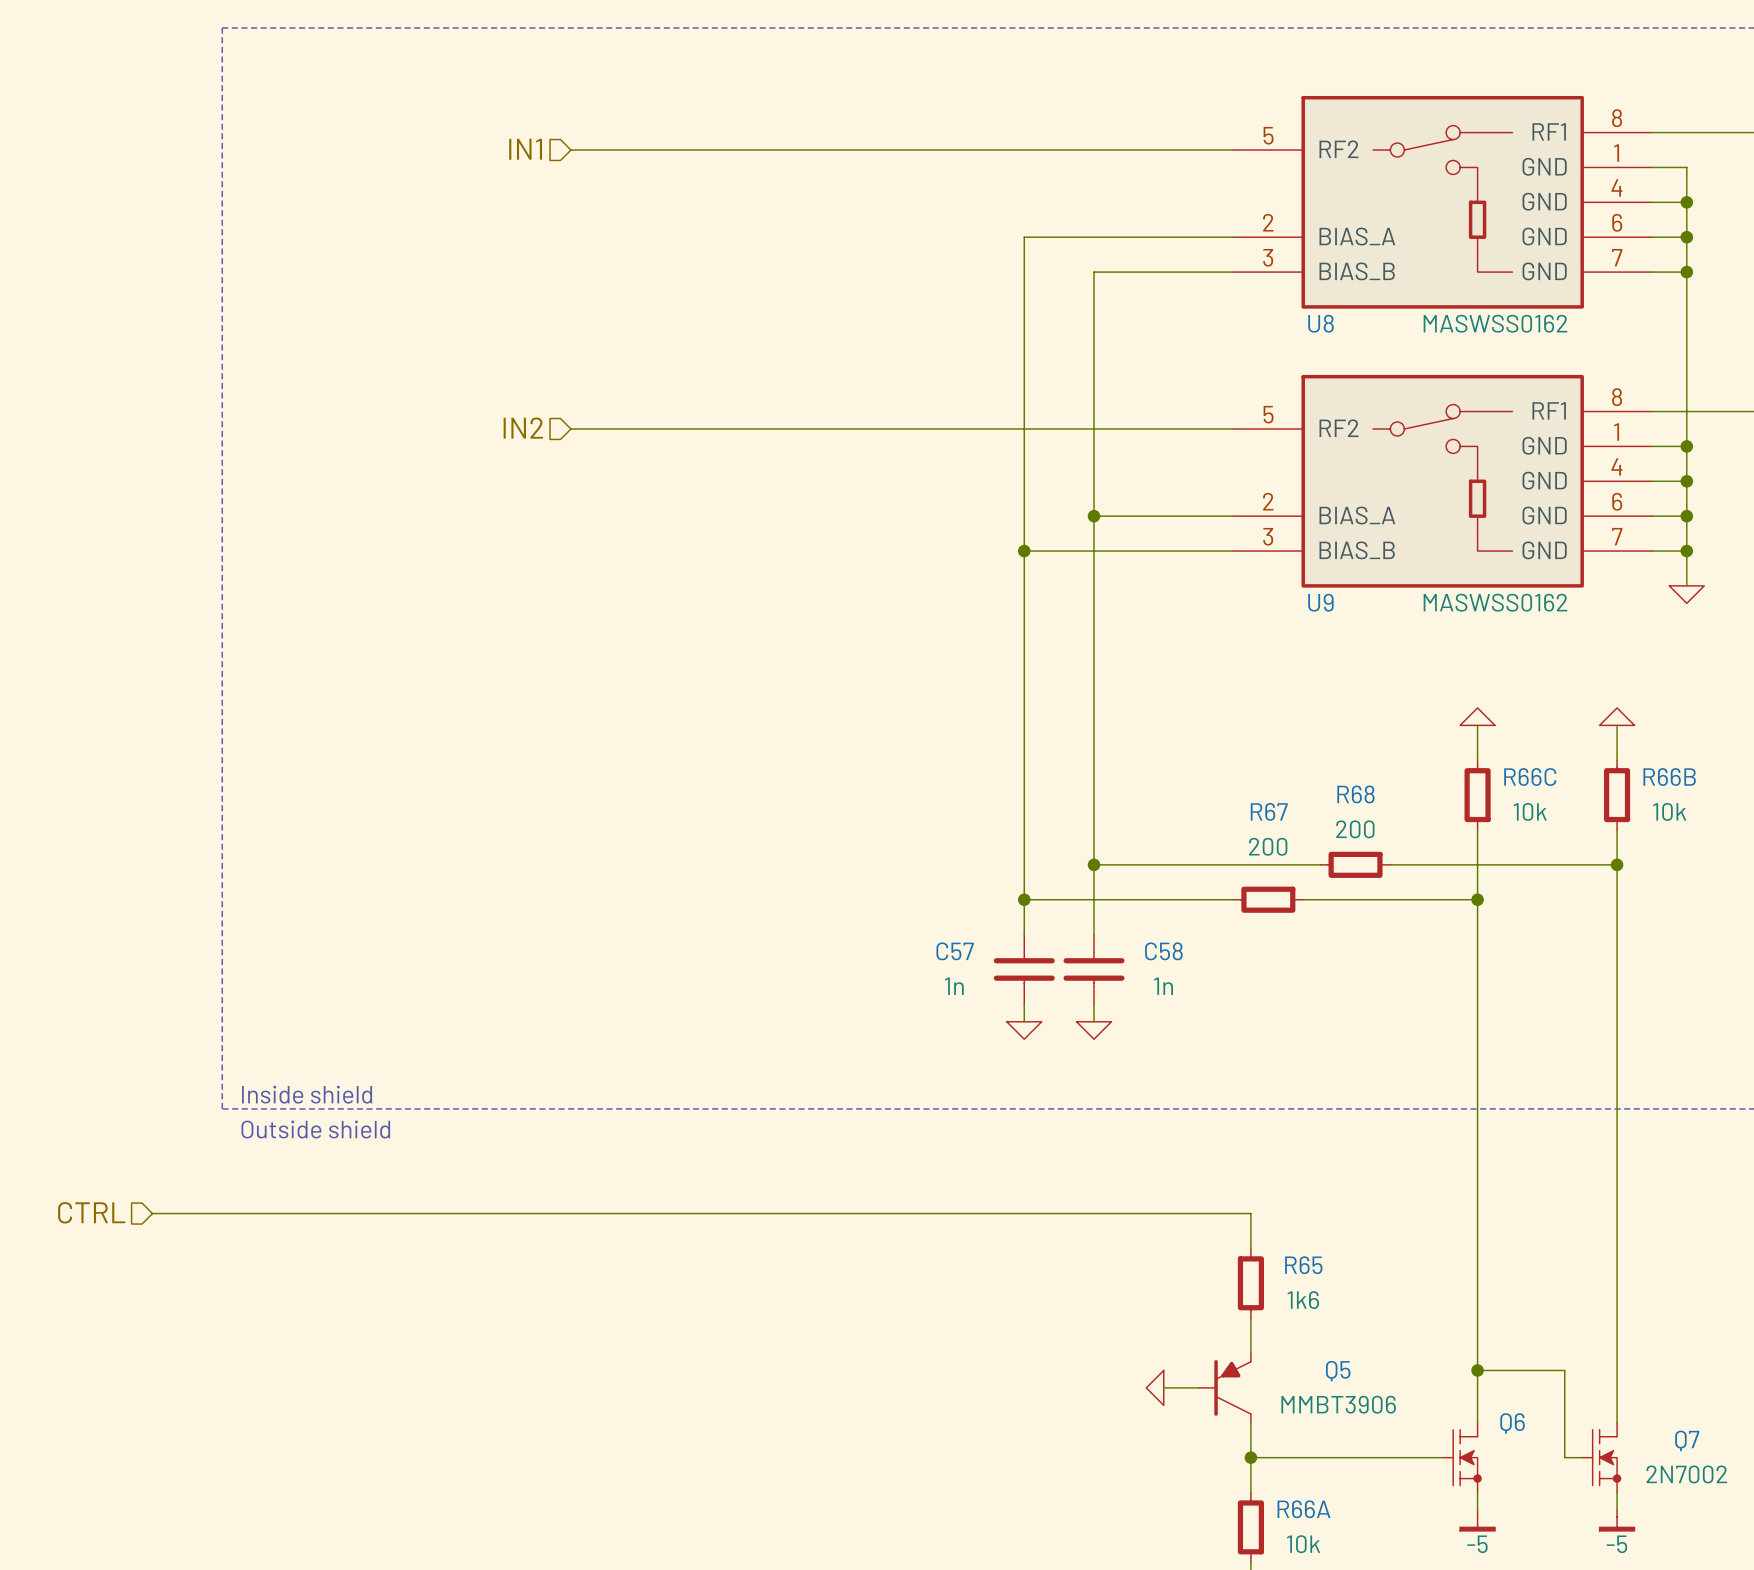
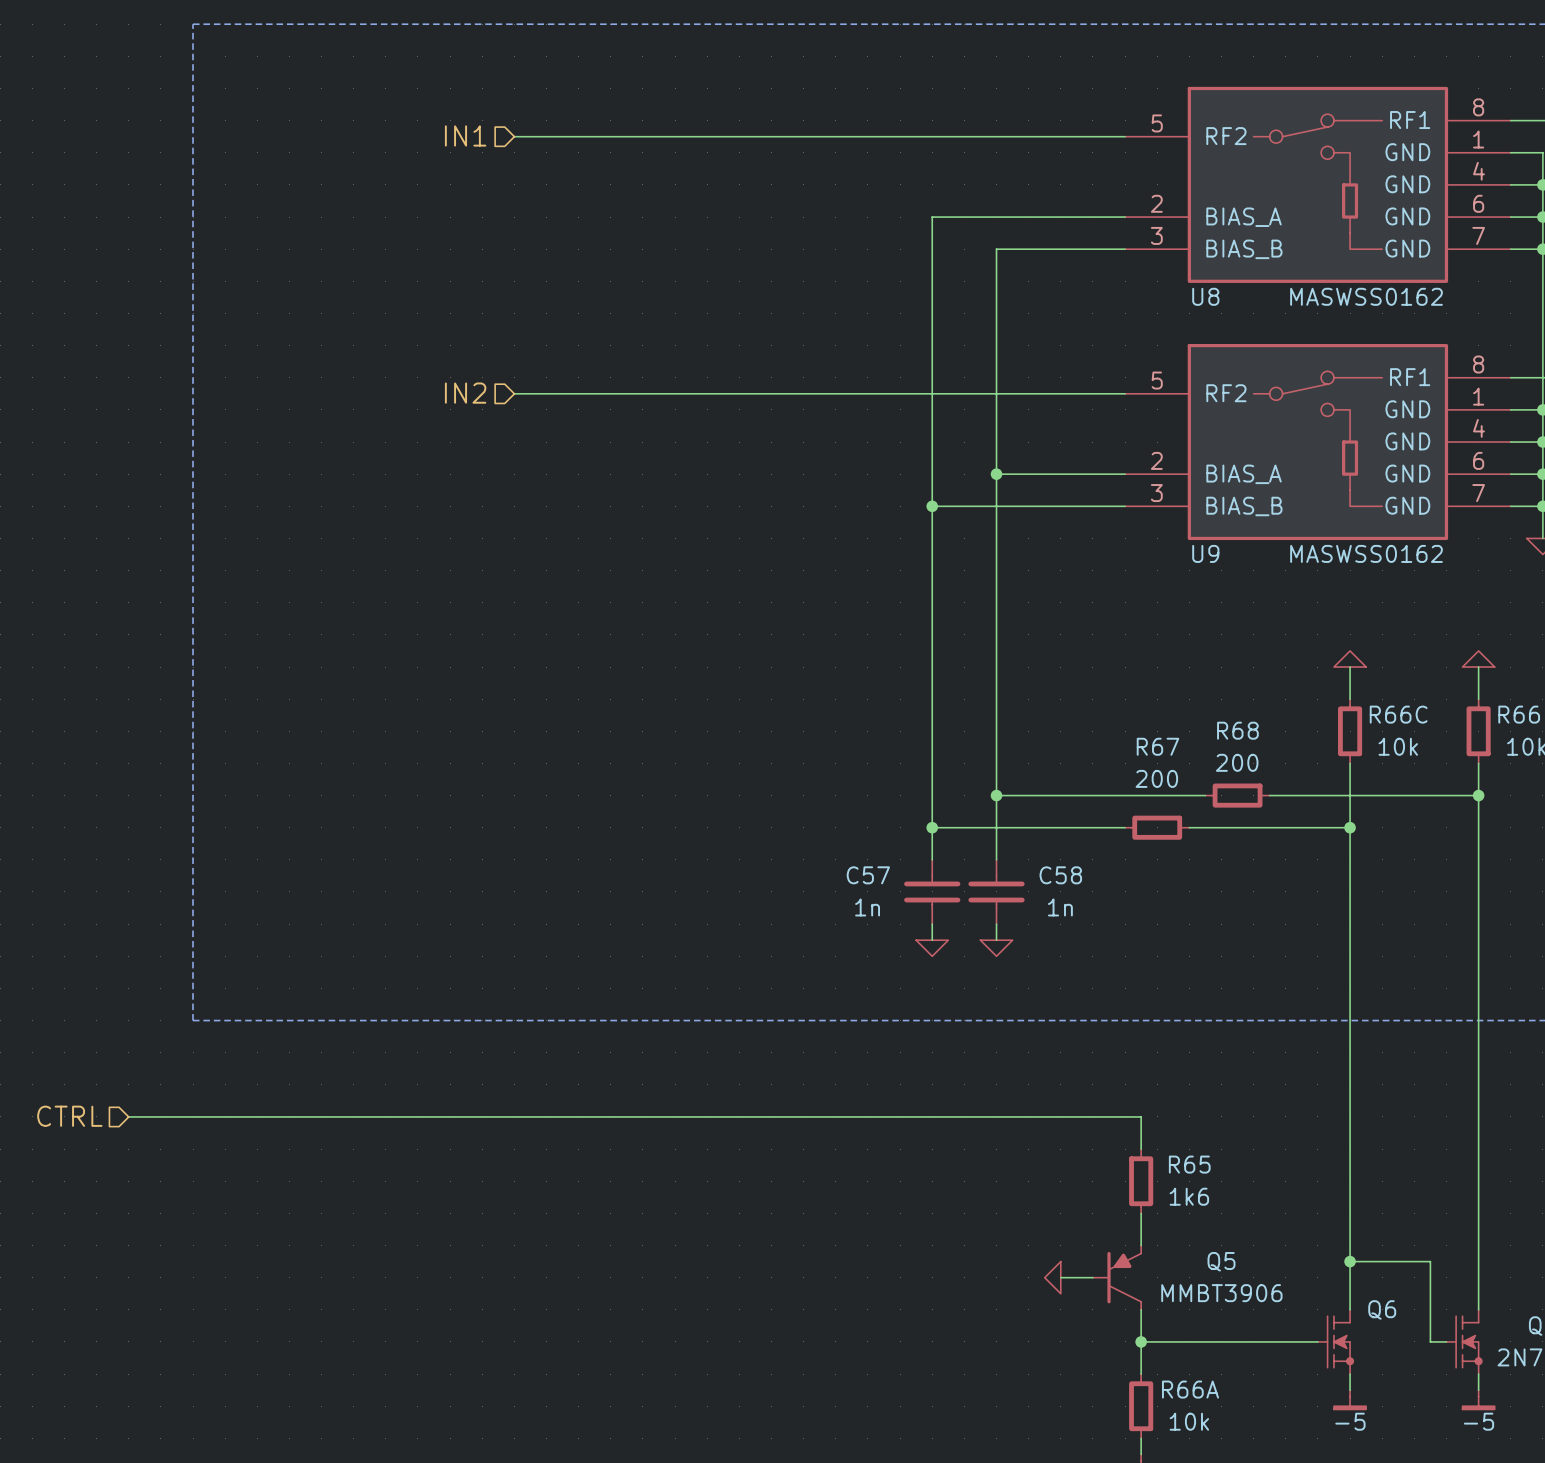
text: Inside shield (307, 1094) -> none
text: Outside shield (315, 1129) -> none

